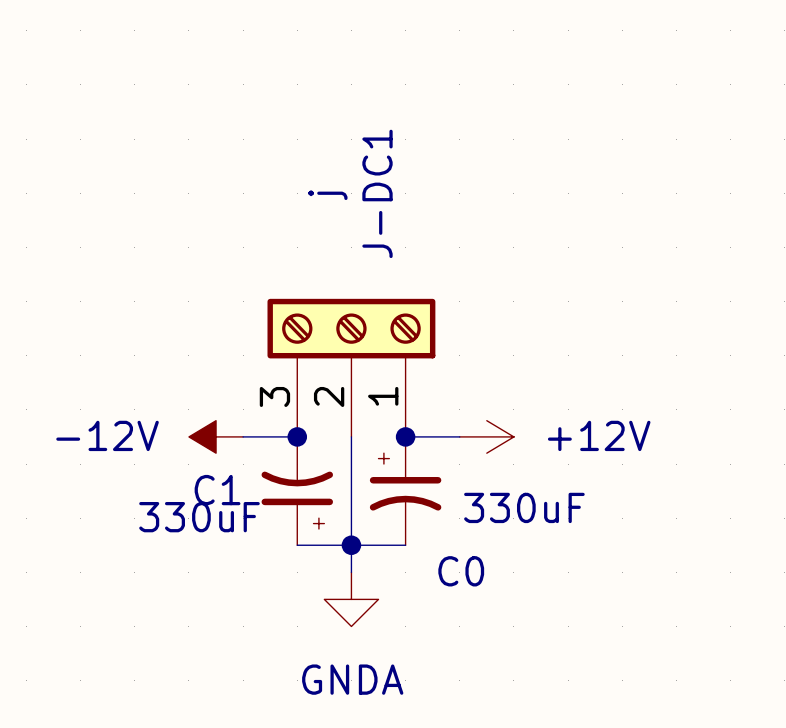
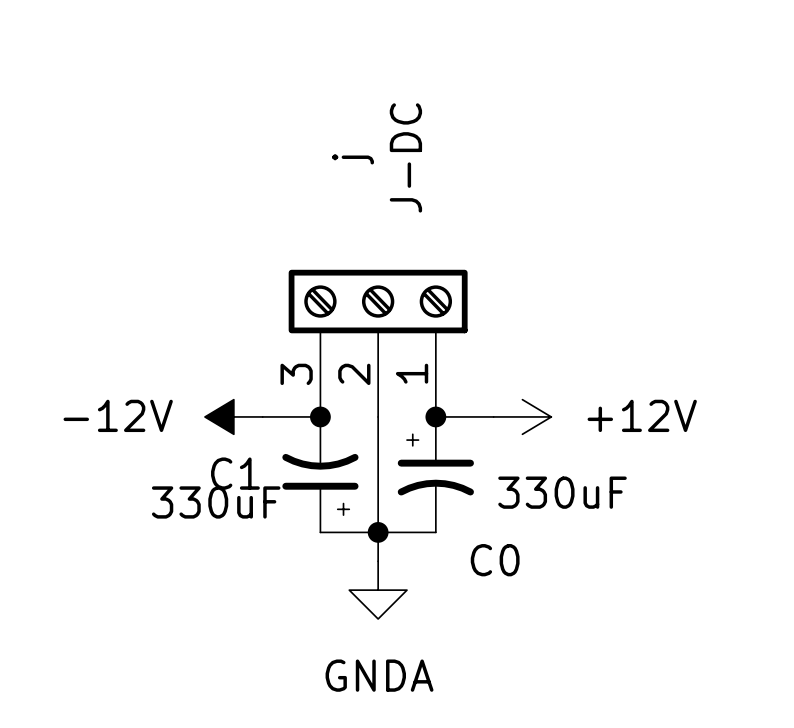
J-DC1 name: J-DC1 (377, 193) -> J-DC (405, 157)

